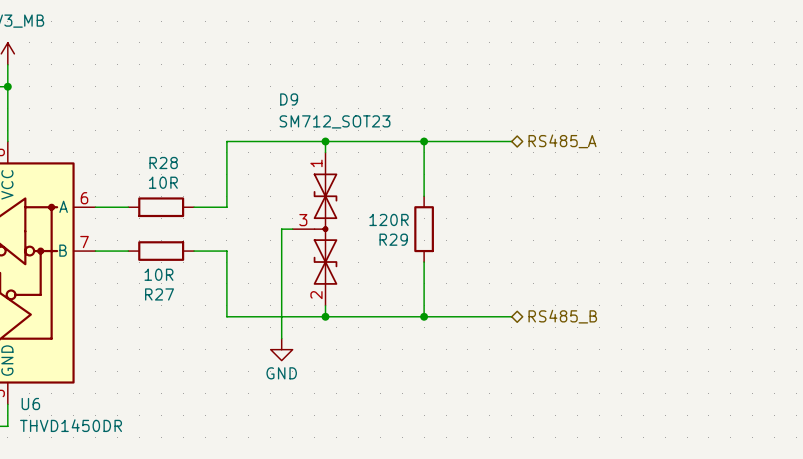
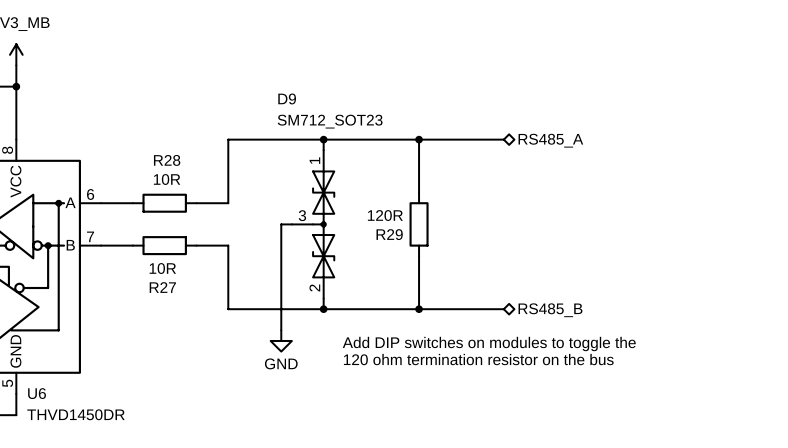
text: none -> Add DIP switches on modules to toggle the (489, 344)
text: none -> 120 ohm termination resistor on the bus (478, 359)

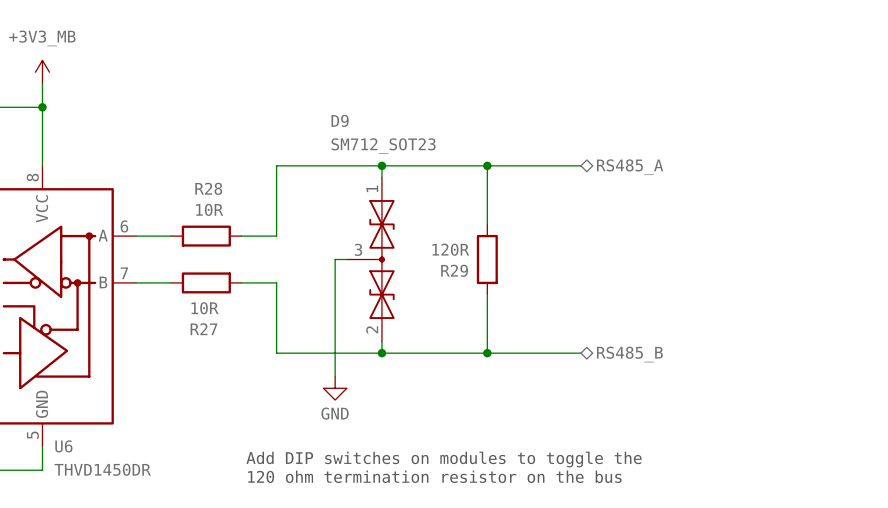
text position: Add DIP switches on modules to toggle the (489, 344) -> Add DIP switches on modules to toggle the (444, 459)
text position: 120 ohm termination resistor on the bus (478, 359) -> 120 ohm termination resistor on the bus (434, 476)

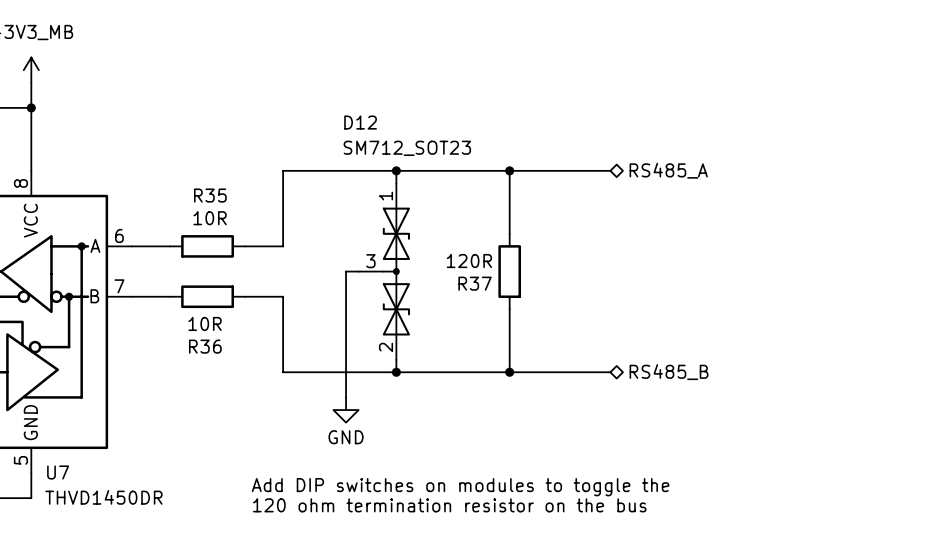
D9 name: D9 (340, 120) -> D12 (360, 122)
R28 name: R28 (208, 188) -> R35 (210, 195)
R29 name: R29 (454, 270) -> R37 (475, 283)
R27 name: R27 (203, 329) -> R36 (205, 346)
U6 name: U6 (63, 446) -> U7 (58, 472)

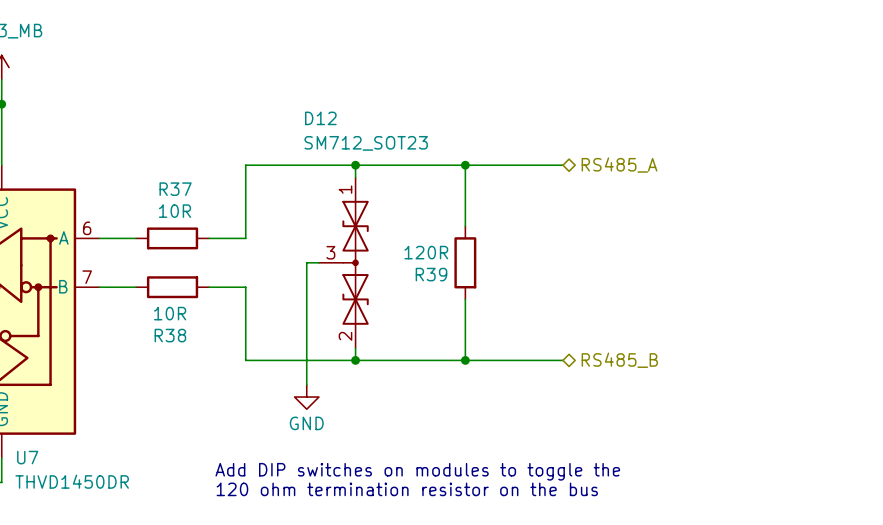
R35 name: R35 (210, 195) -> R37 (175, 189)
R37 name: R37 (475, 283) -> R39 (431, 274)
R36 name: R36 (205, 346) -> R38 (170, 335)

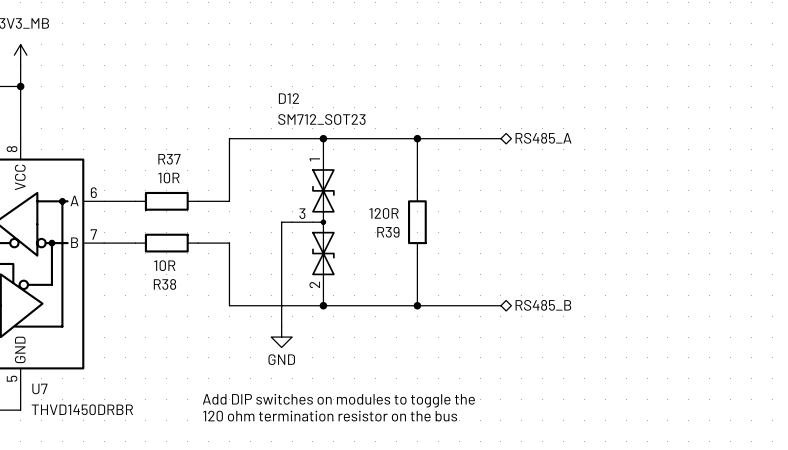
U7 value: THVD1450DR (72, 481) -> THVD1450DRBR (82, 409)

